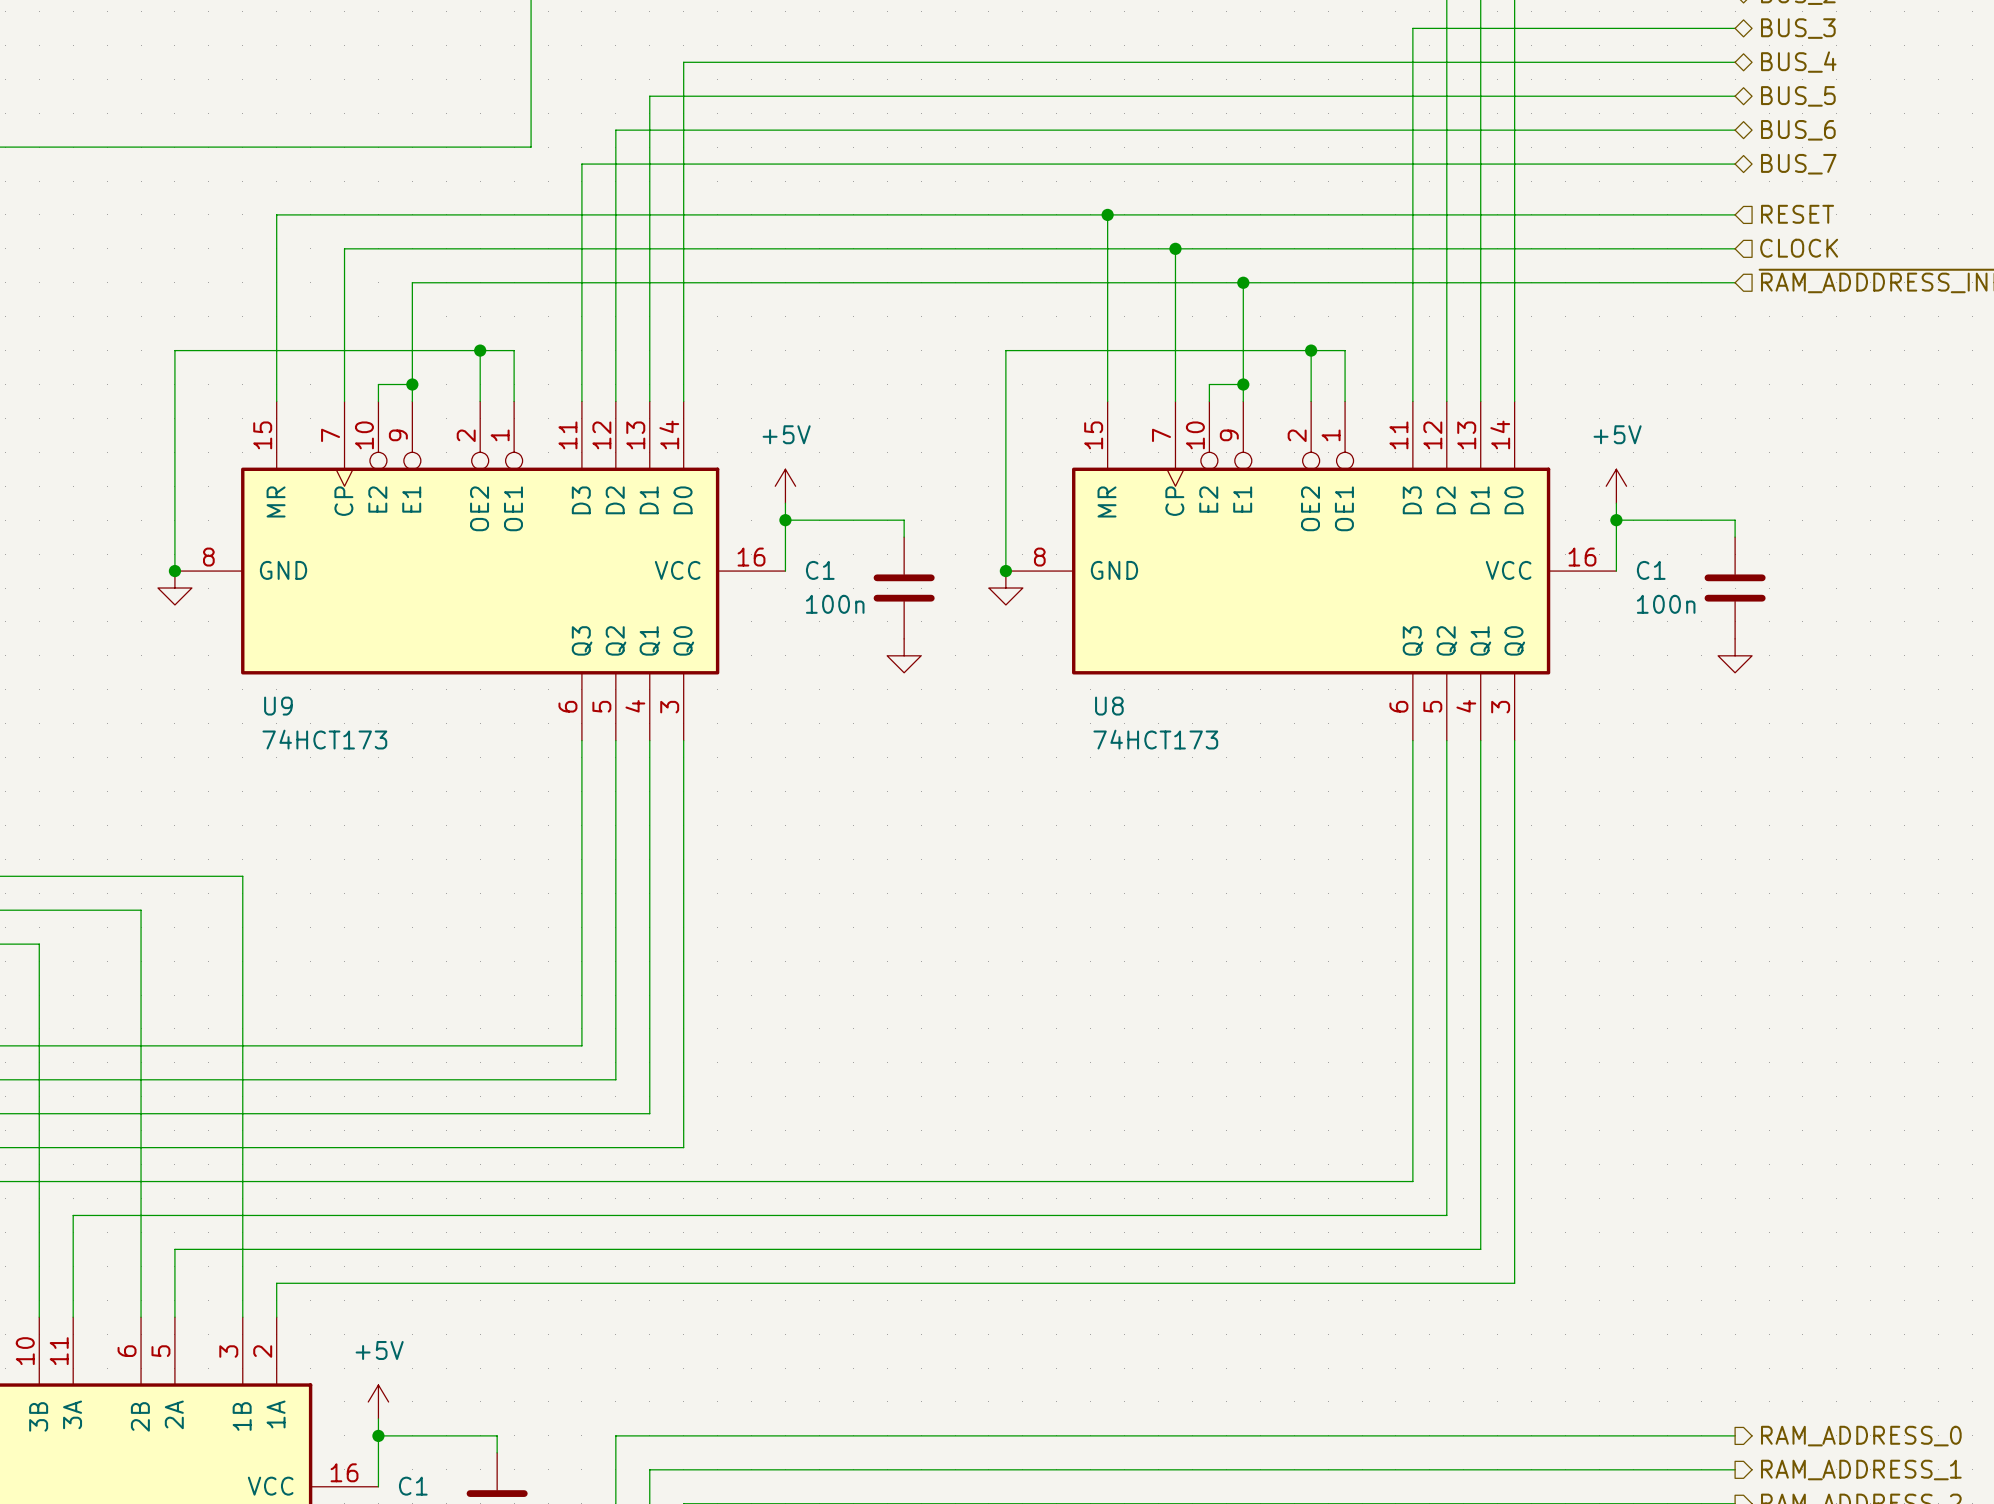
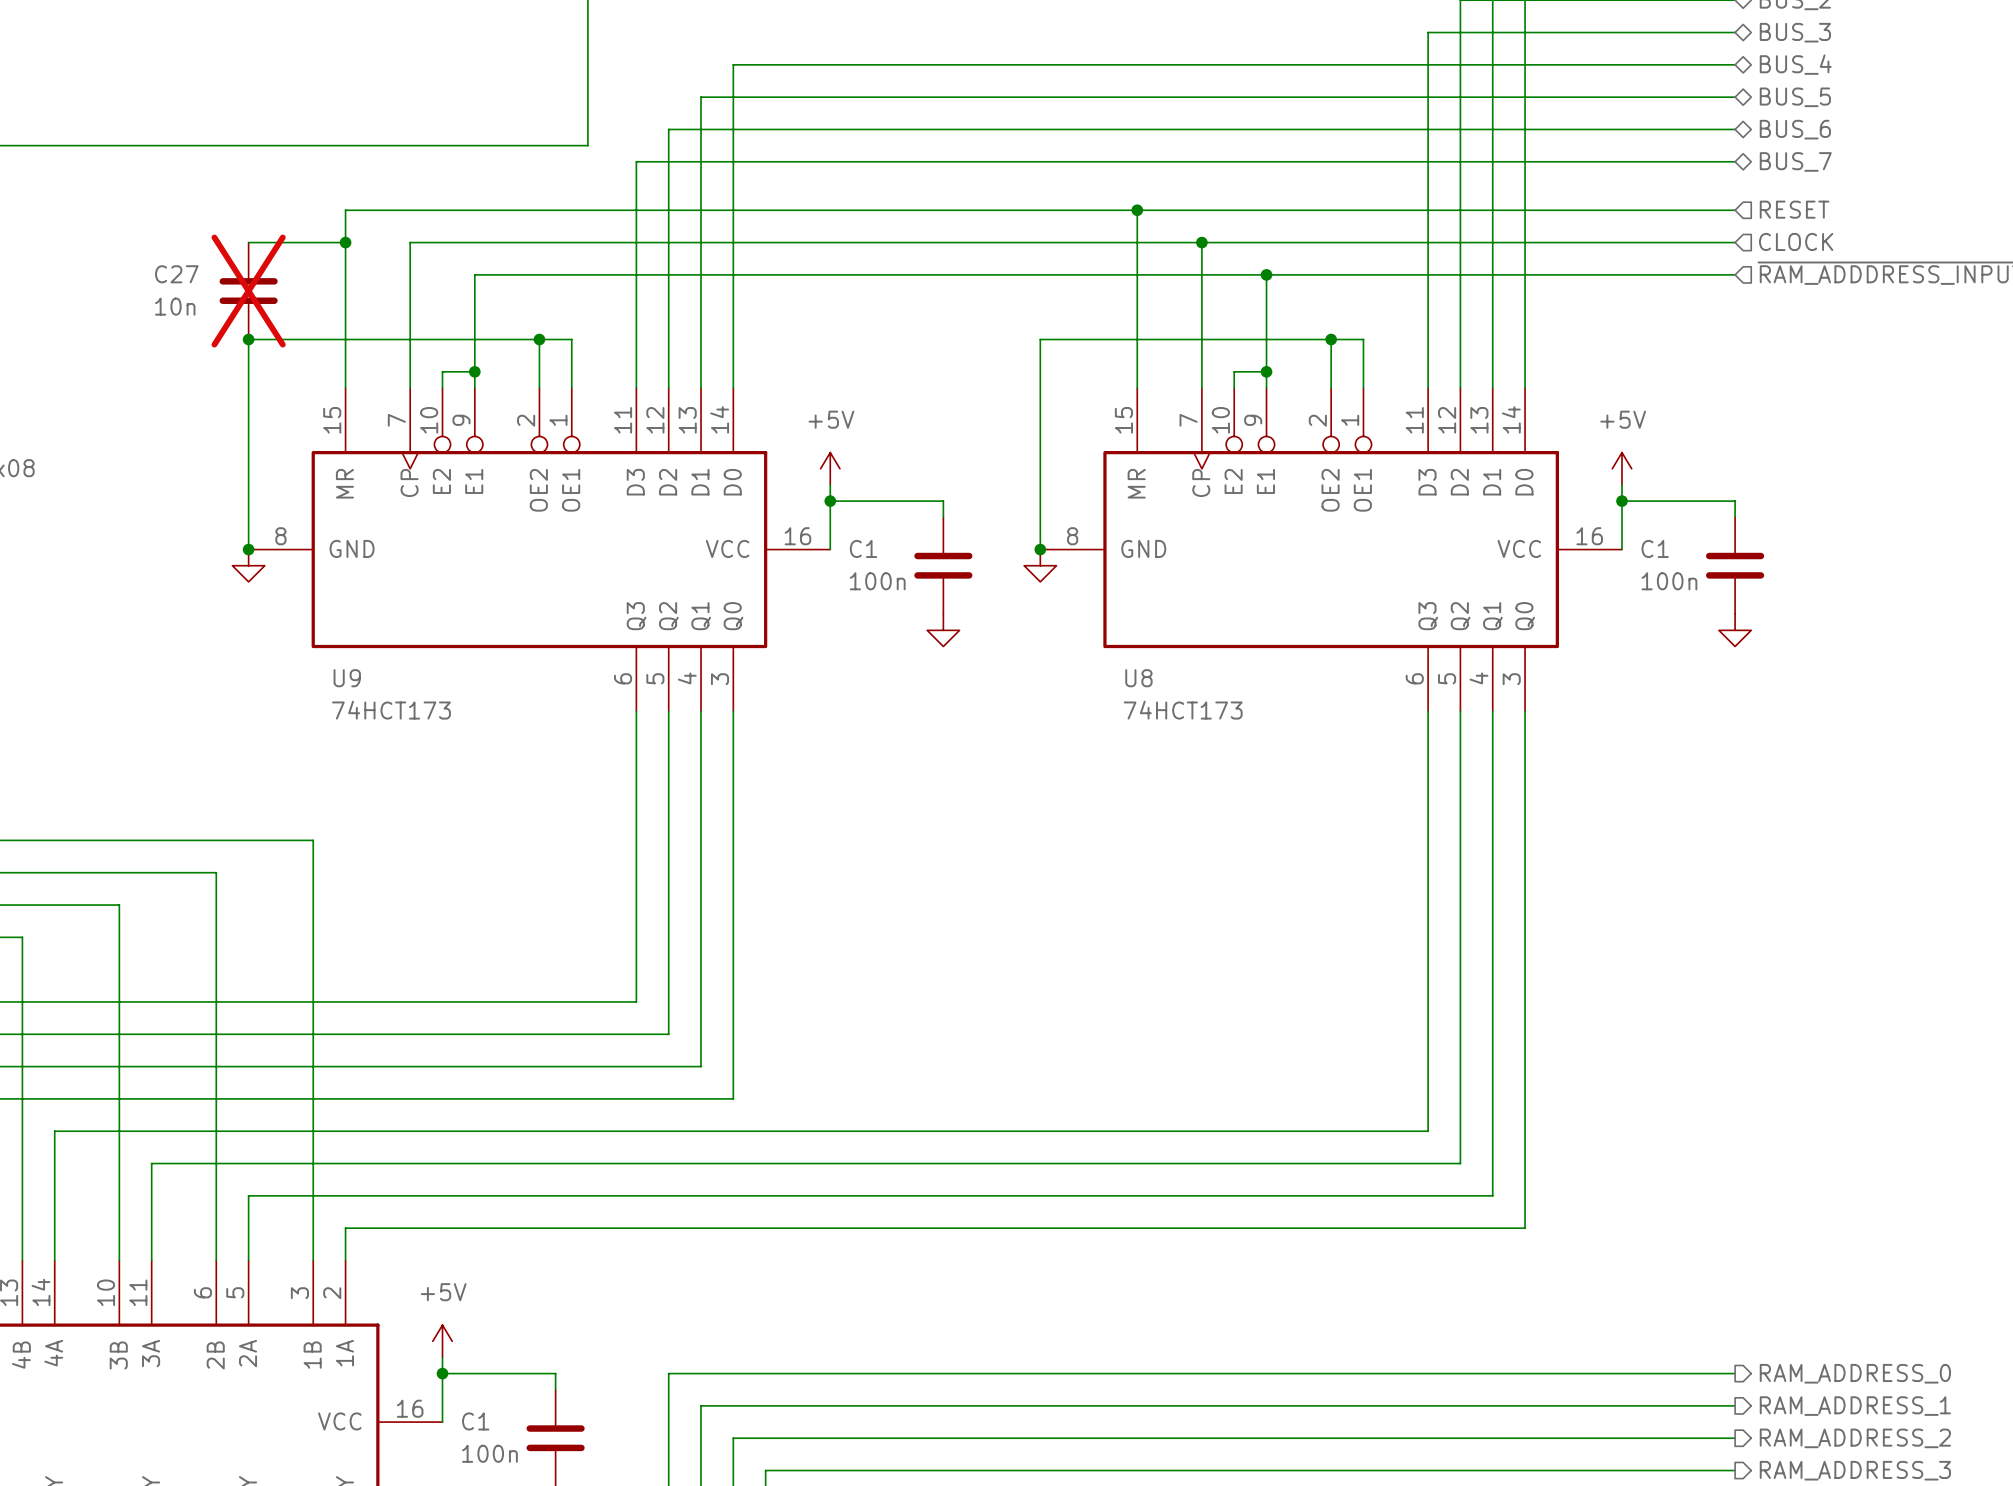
wire: none -> (248, 242) (345, 242)
junction: none -> (345, 242)
C27: none -> 10n (248, 291)
junction: none -> (248, 339)

